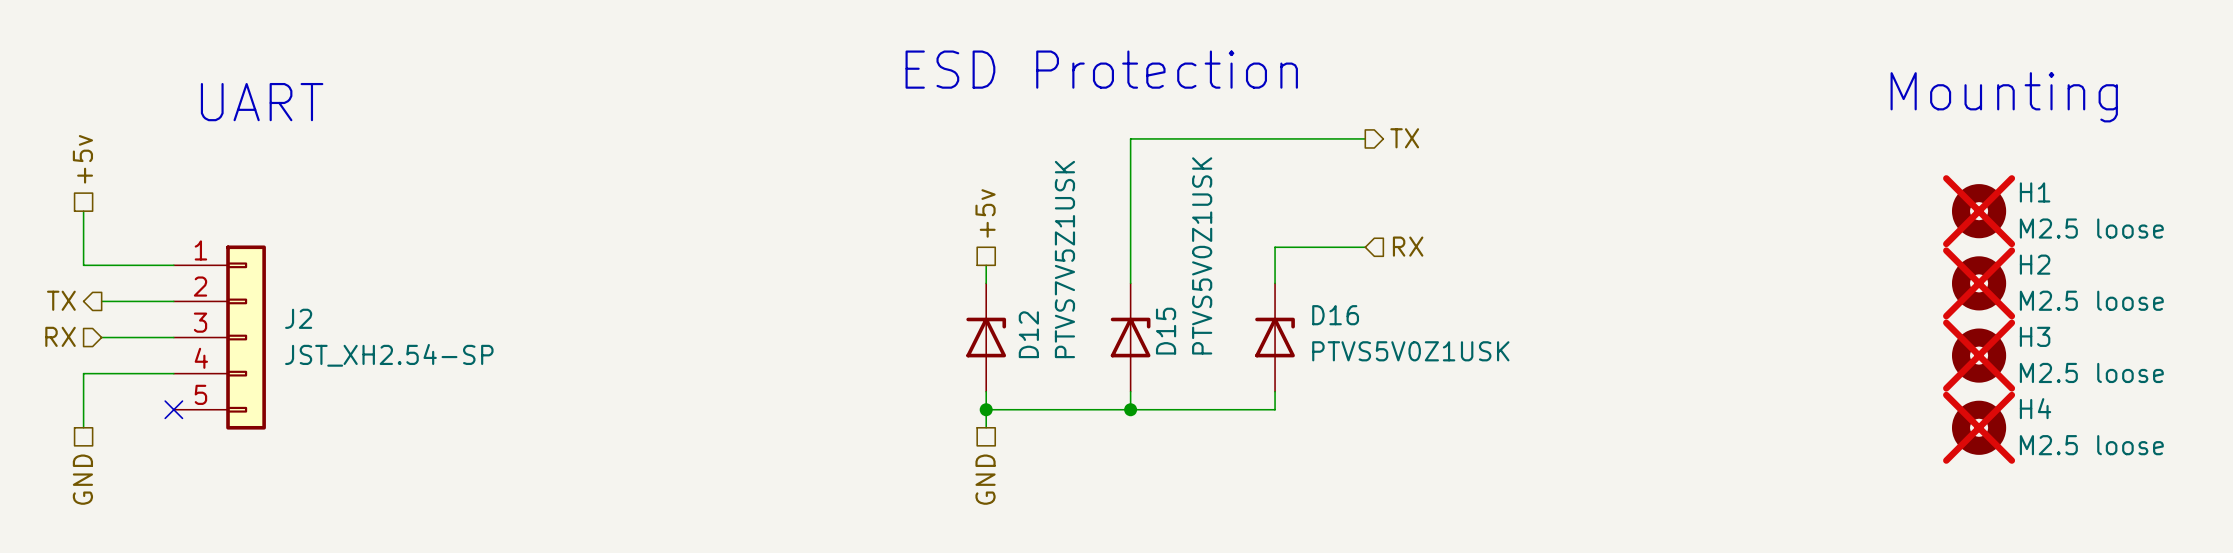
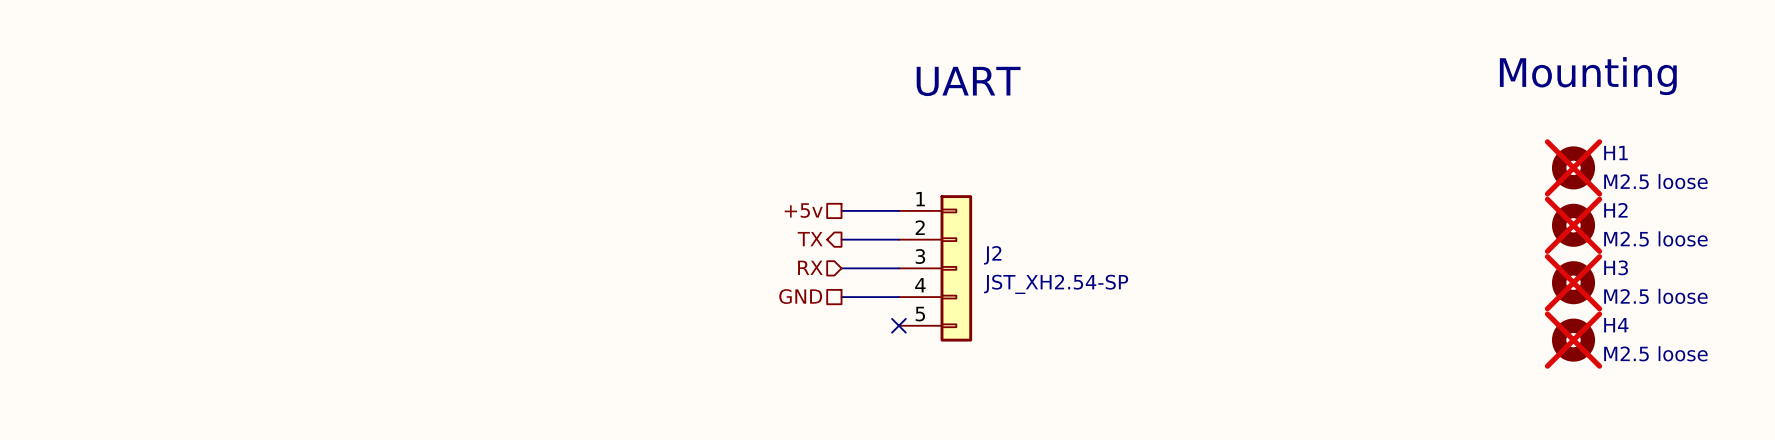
text: ESD Protection (1101, 69) -> none
text: UART (262, 102) -> none
text: none -> UART (968, 81)
wire: (1365, 138) (1130, 138) (1130, 283) -> none
hierarchical label: TX (1404, 138) -> none
hierarchical label: +5v (82, 159) -> none
wire: (83, 211) (83, 265) (173, 265) -> none
hierarchical label rotation: 0° (985, 213) -> 90° counterclockwise (803, 210)
hierarchical label: RX (1408, 246) -> none
wire: (1365, 247) (1275, 247) (1275, 283) -> none
wire: (986, 265) (986, 283) -> none
wire: none -> (841, 210) (898, 210)
hierarchical label: TX (61, 300) -> none
hierarchical label: none -> TX (810, 239)
wire: (101, 301) (173, 301) -> none
wire: none -> (841, 239) (898, 239)
hierarchical label: RX (60, 336) -> none
hierarchical label: none -> RX (810, 267)
wire: (101, 337) (173, 337) -> none
J2 position: (219, 337) -> (935, 268)
D12: PTVS7V5Z1USK (986, 337) -> none
wire: none -> (841, 268) (898, 268)
D15: PTVS5V0Z1USK (1130, 337) -> none
D16: PTVS5V0Z1USK (1275, 337) -> none
wire: (173, 373) (83, 373) (83, 427) -> none
wire: none -> (841, 297) (898, 297)
wire: (986, 391) (986, 427) -> none
wire: (1130, 391) (1130, 409) -> none
wire: (1275, 391) (1275, 409) (986, 409) -> none
no-connect mark: (173, 409) -> none
junction: (986, 409) -> none
junction: (1130, 409) -> none
no-connect mark: none -> (898, 325)
hierarchical label: GND (82, 479) -> none
hierarchical label rotation: 0° (985, 479) -> 90° clockwise (800, 296)
hierarchical label position: GND (985, 479) -> GND (800, 296)

